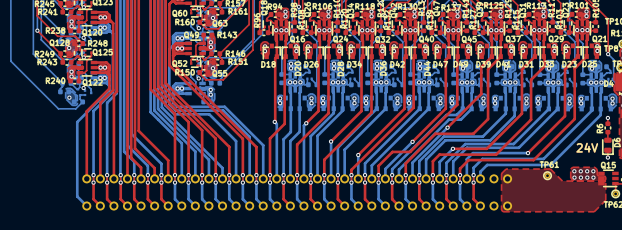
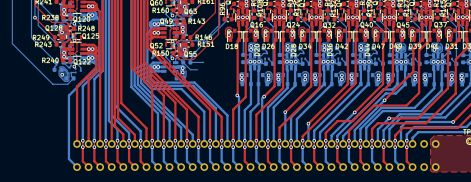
bottom track: none -> (165, 54) (155, 54) (152, 58)
bottom track: none -> (203, 62) (190, 62)
bottom track: none -> (183, 62) (190, 69) (197, 69)

